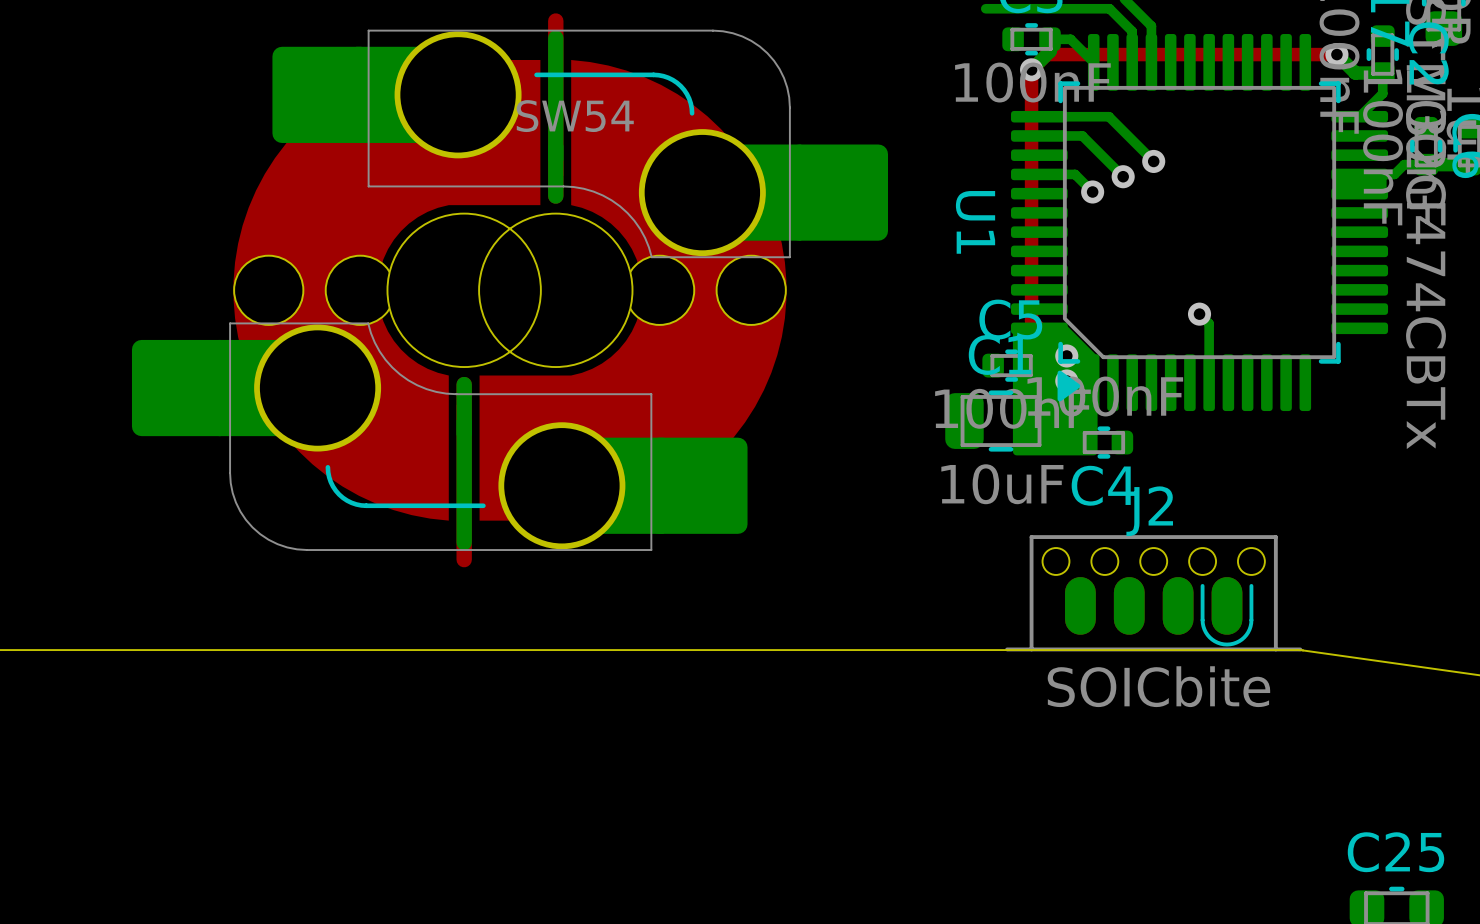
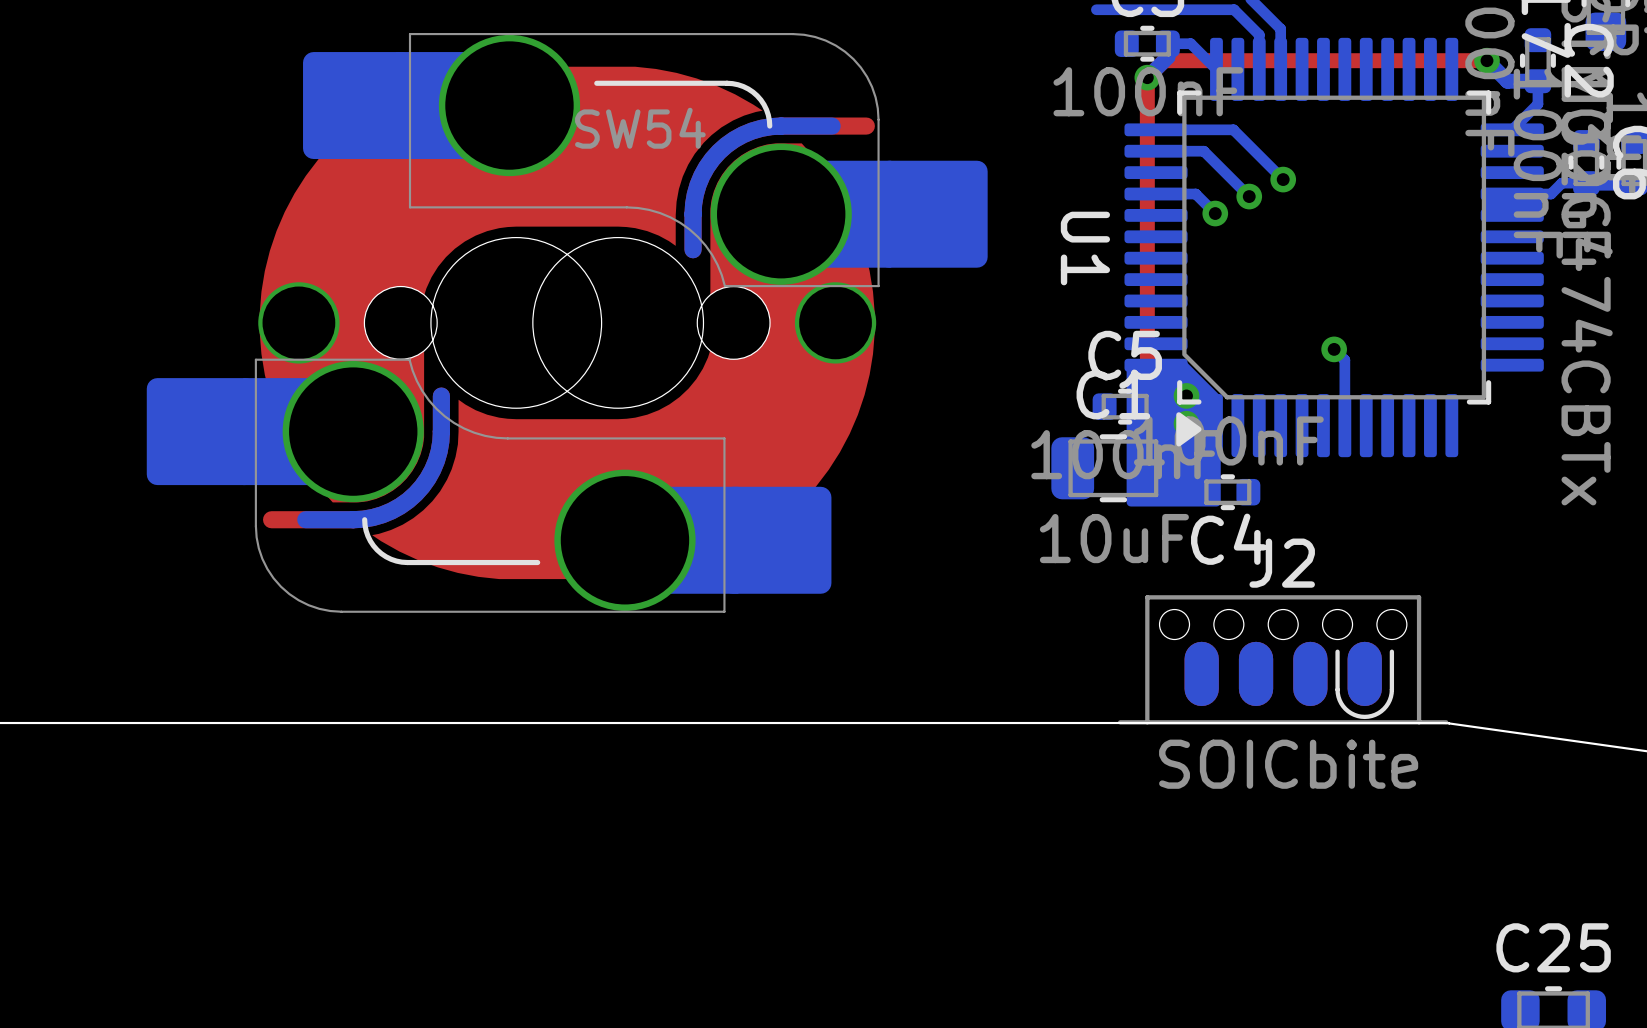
SW54 footprint: [131, 13, 888, 568] -> [146, 32, 988, 613]

